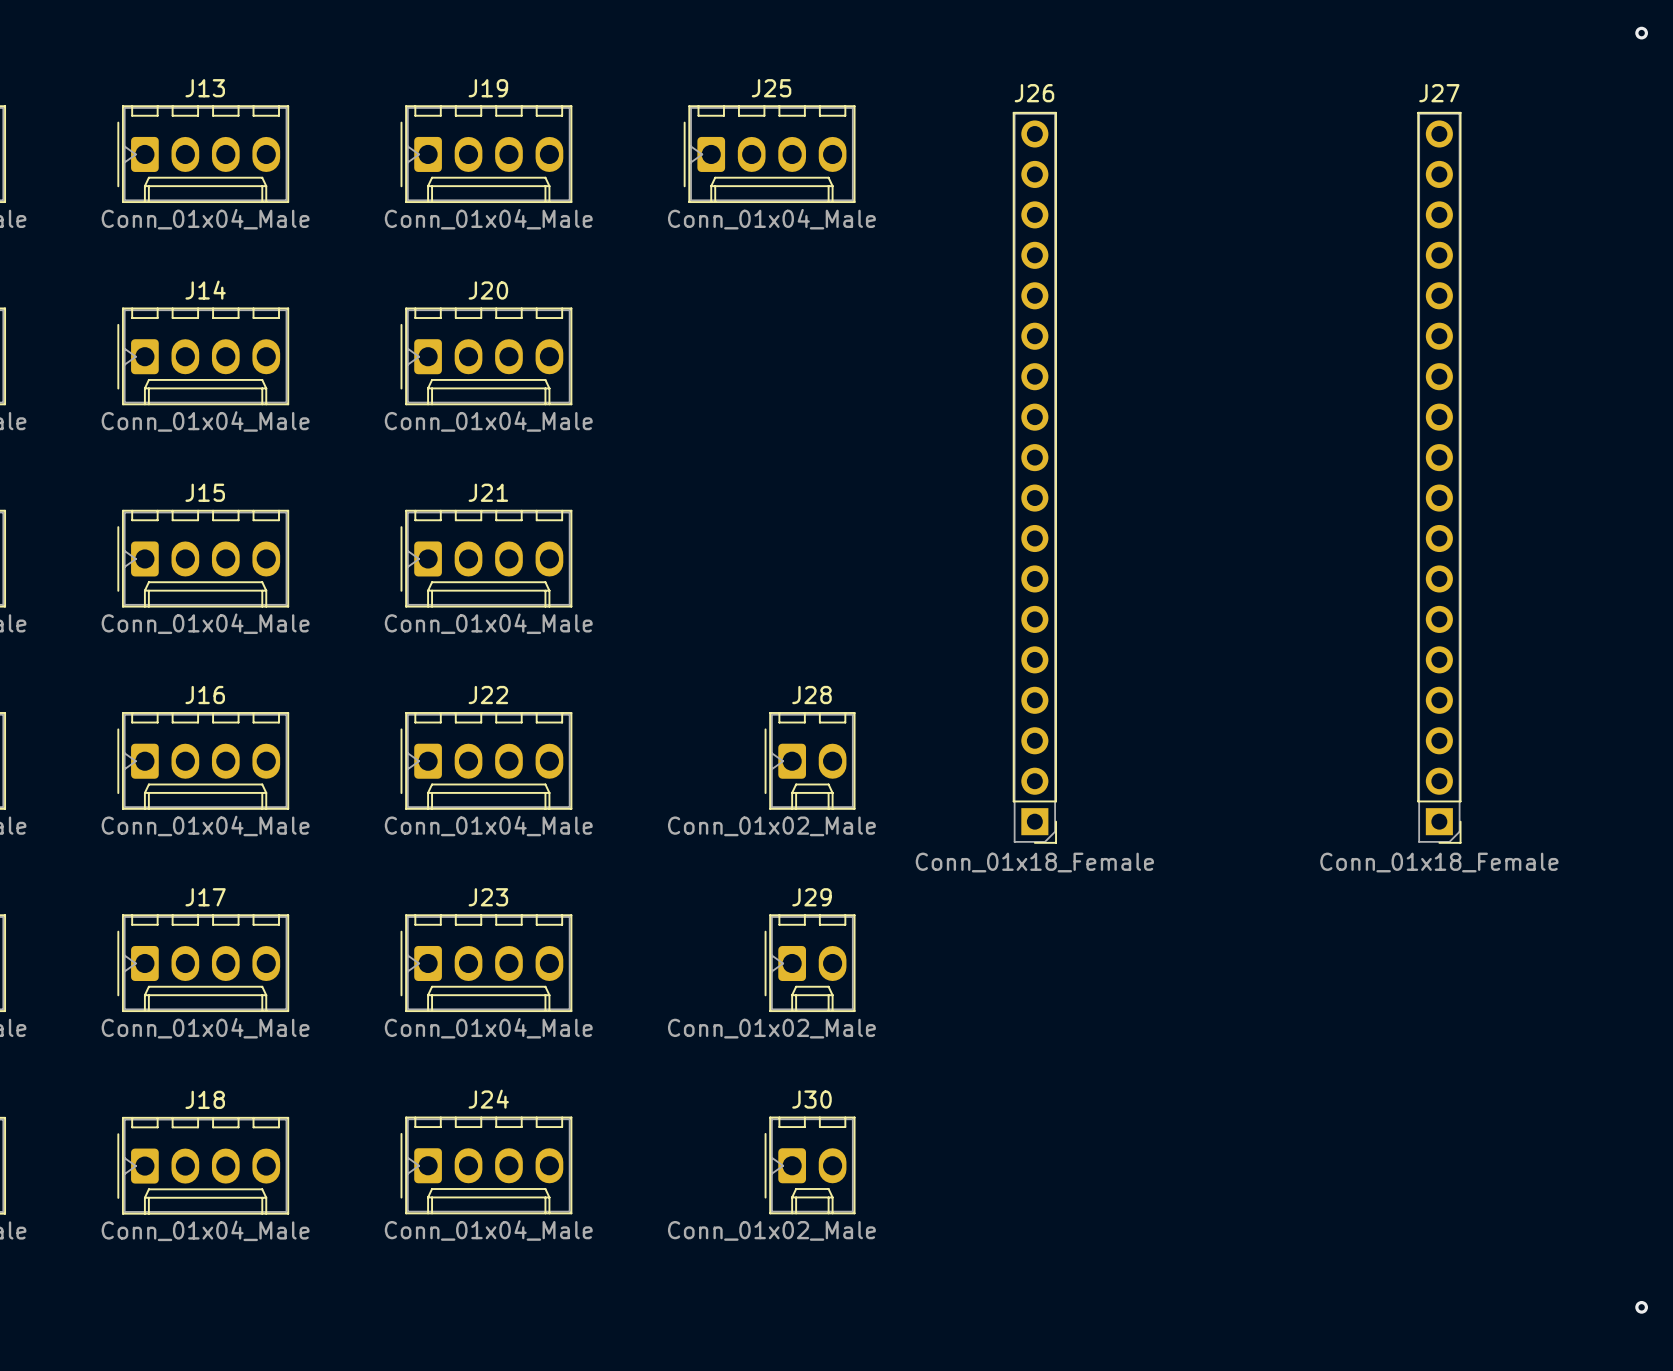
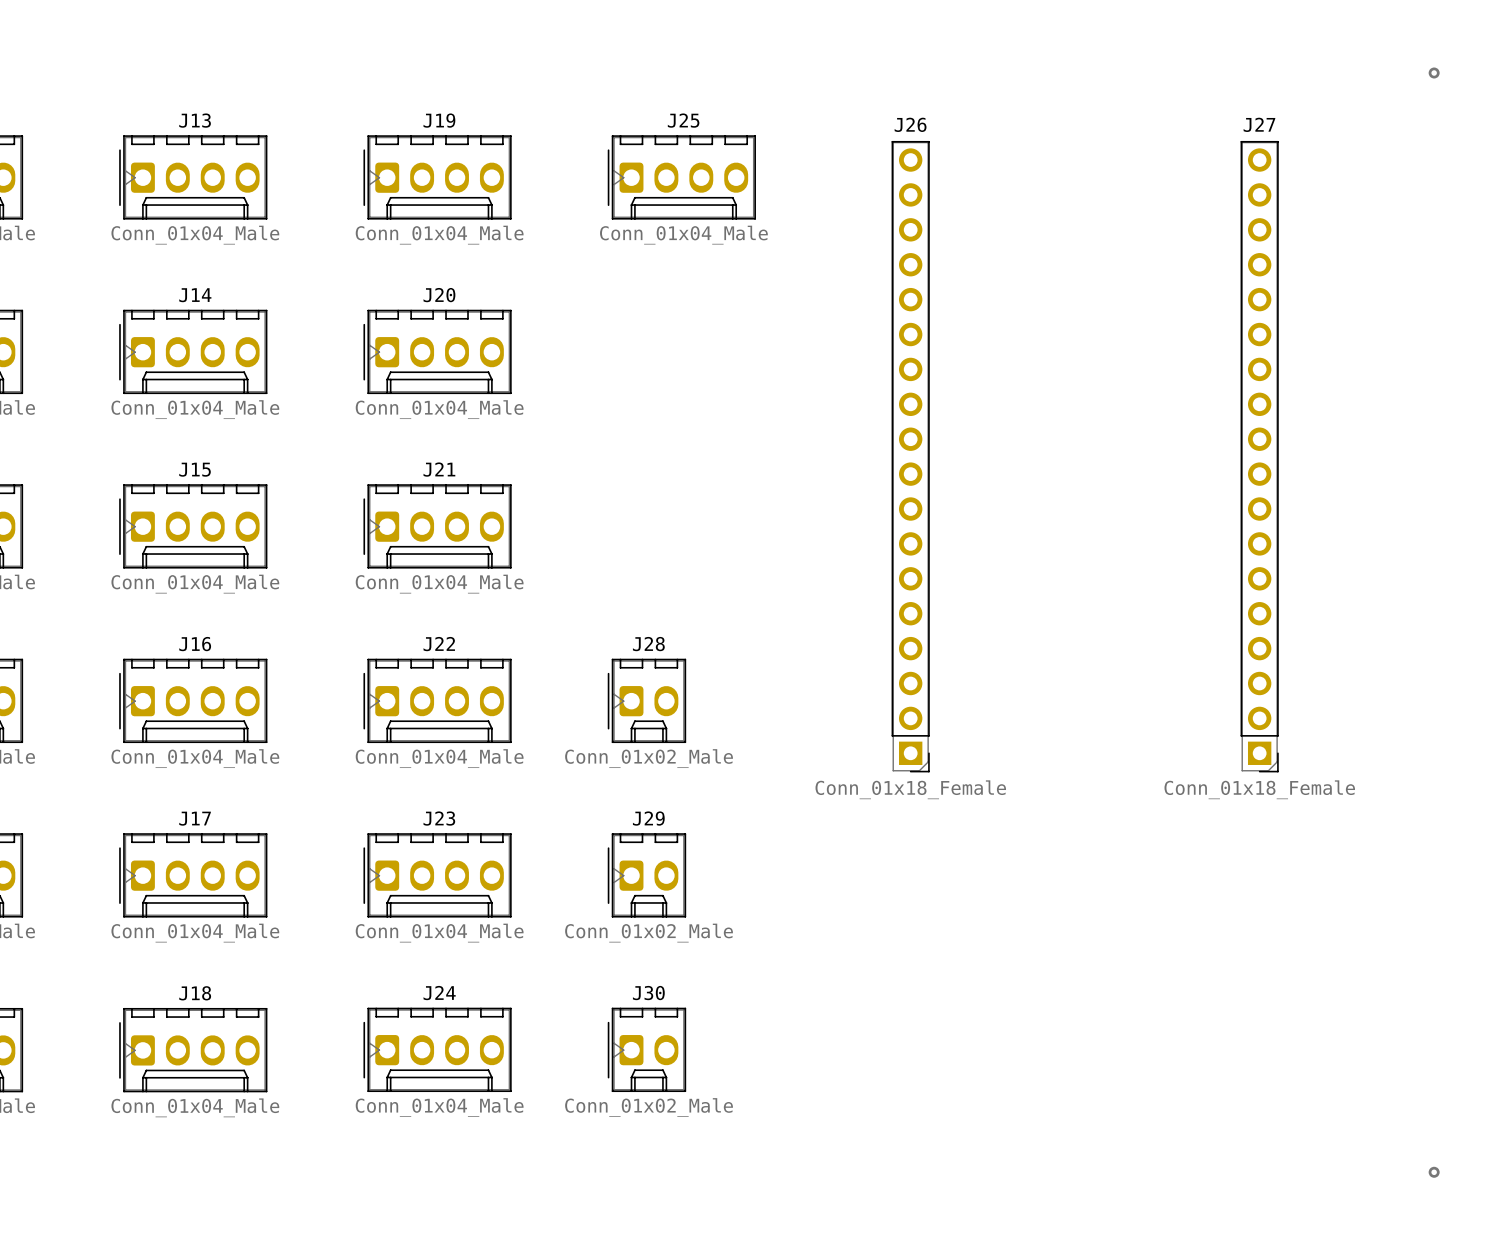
J28 position: (810, 760) -> (646, 700)
J28 value position: Conn_01x02_Male (771, 826) -> Conn_01x02_Male (649, 758)
J29 position: (810, 963) -> (646, 875)
J29 value position: Conn_01x02_Male (771, 1028) -> Conn_01x02_Male (649, 933)
J30 position: (810, 1165) -> (646, 1049)
J30 value position: Conn_01x02_Male (771, 1230) -> Conn_01x02_Male (649, 1107)

